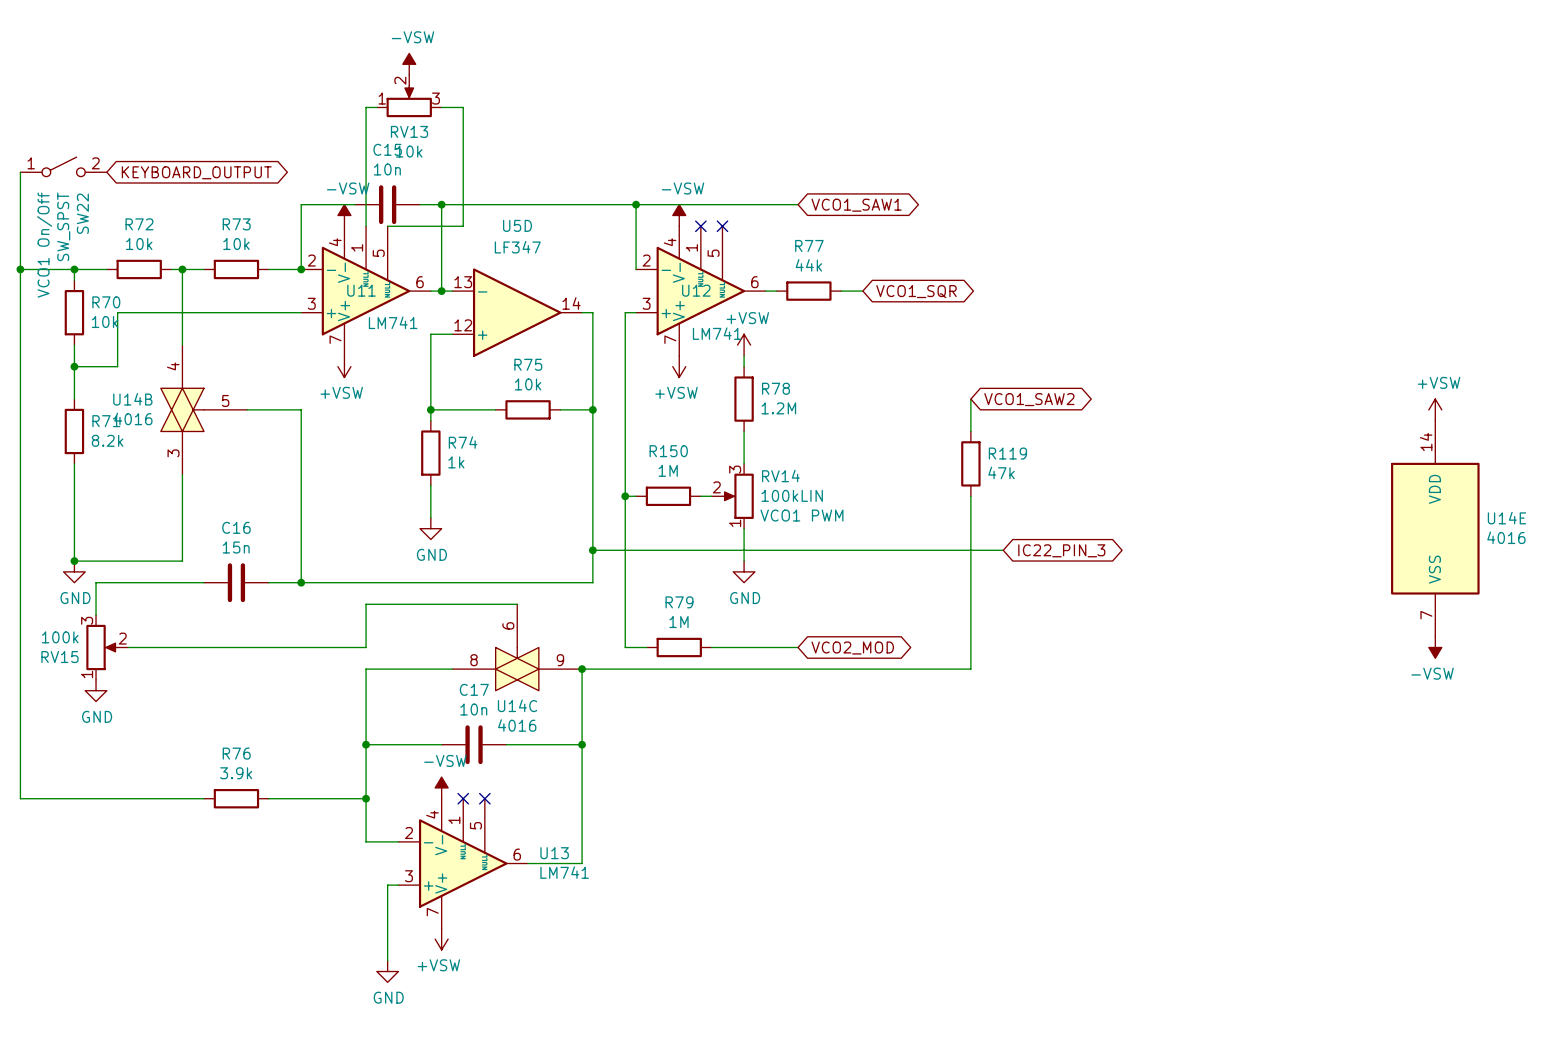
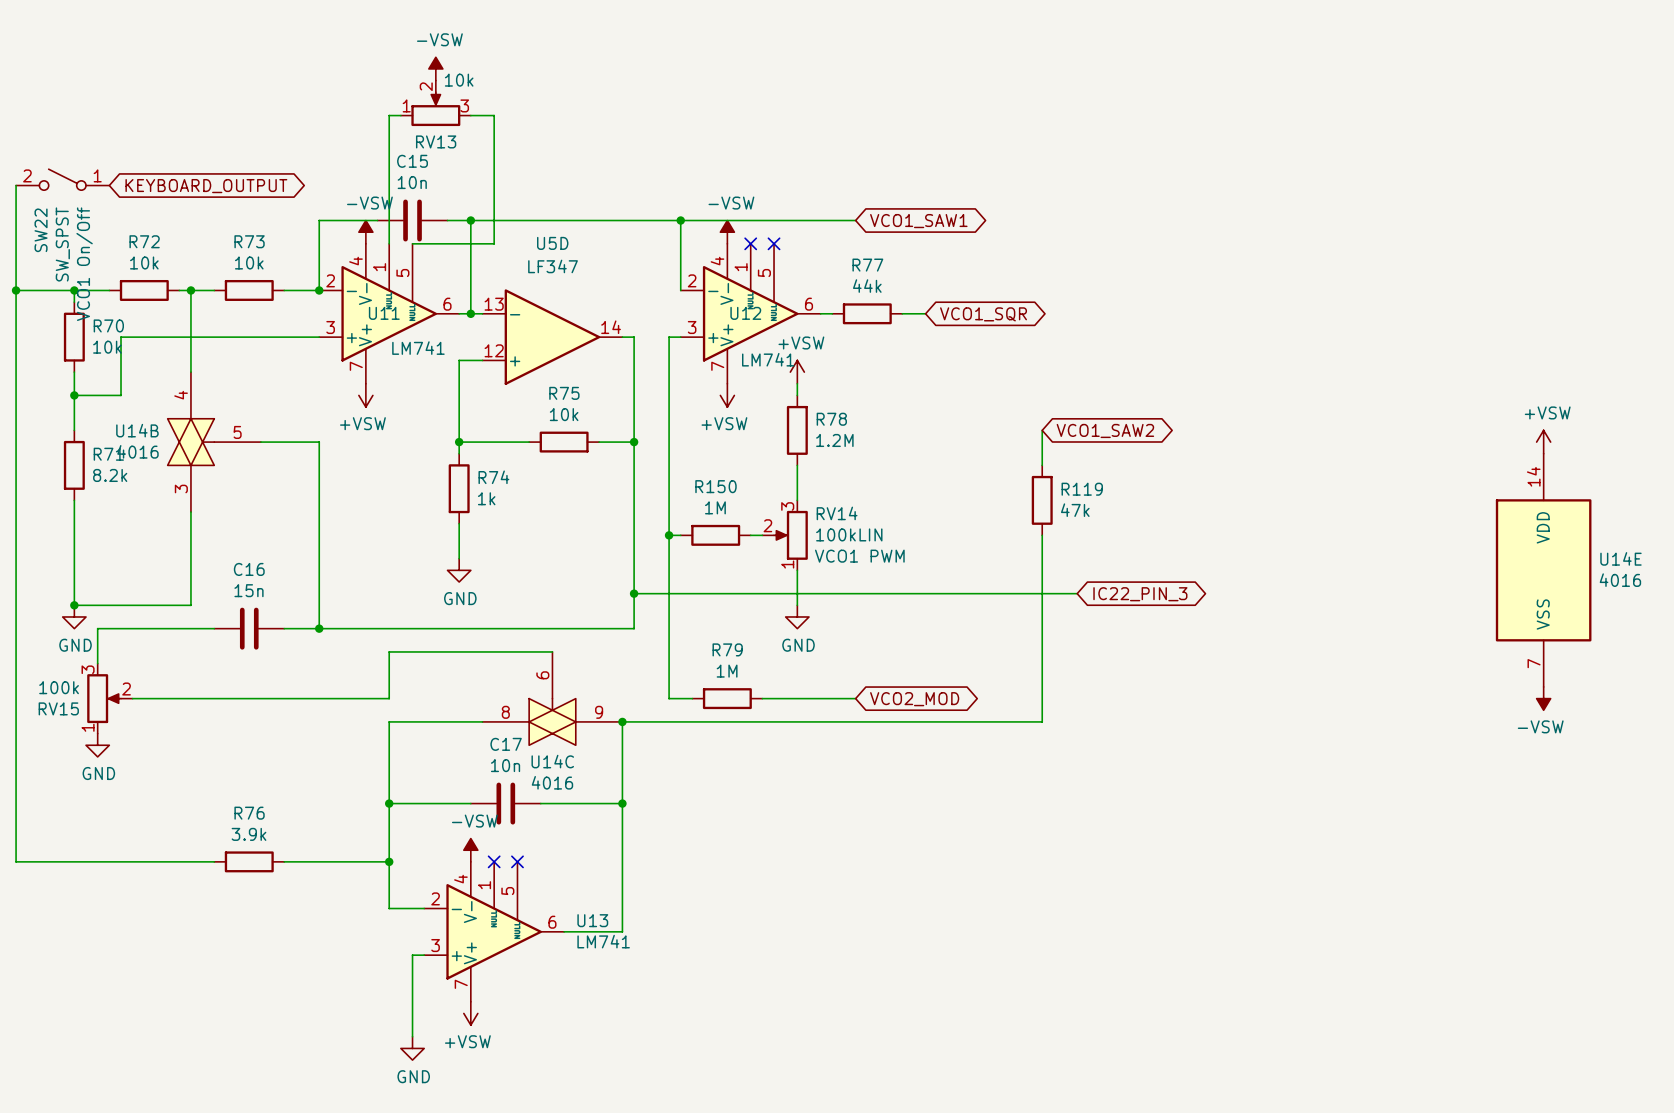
RV13 value position: 10k (409, 151) -> 10k (459, 80)
SW22 flip: as is (63, 166) -> left-right (62, 179)

